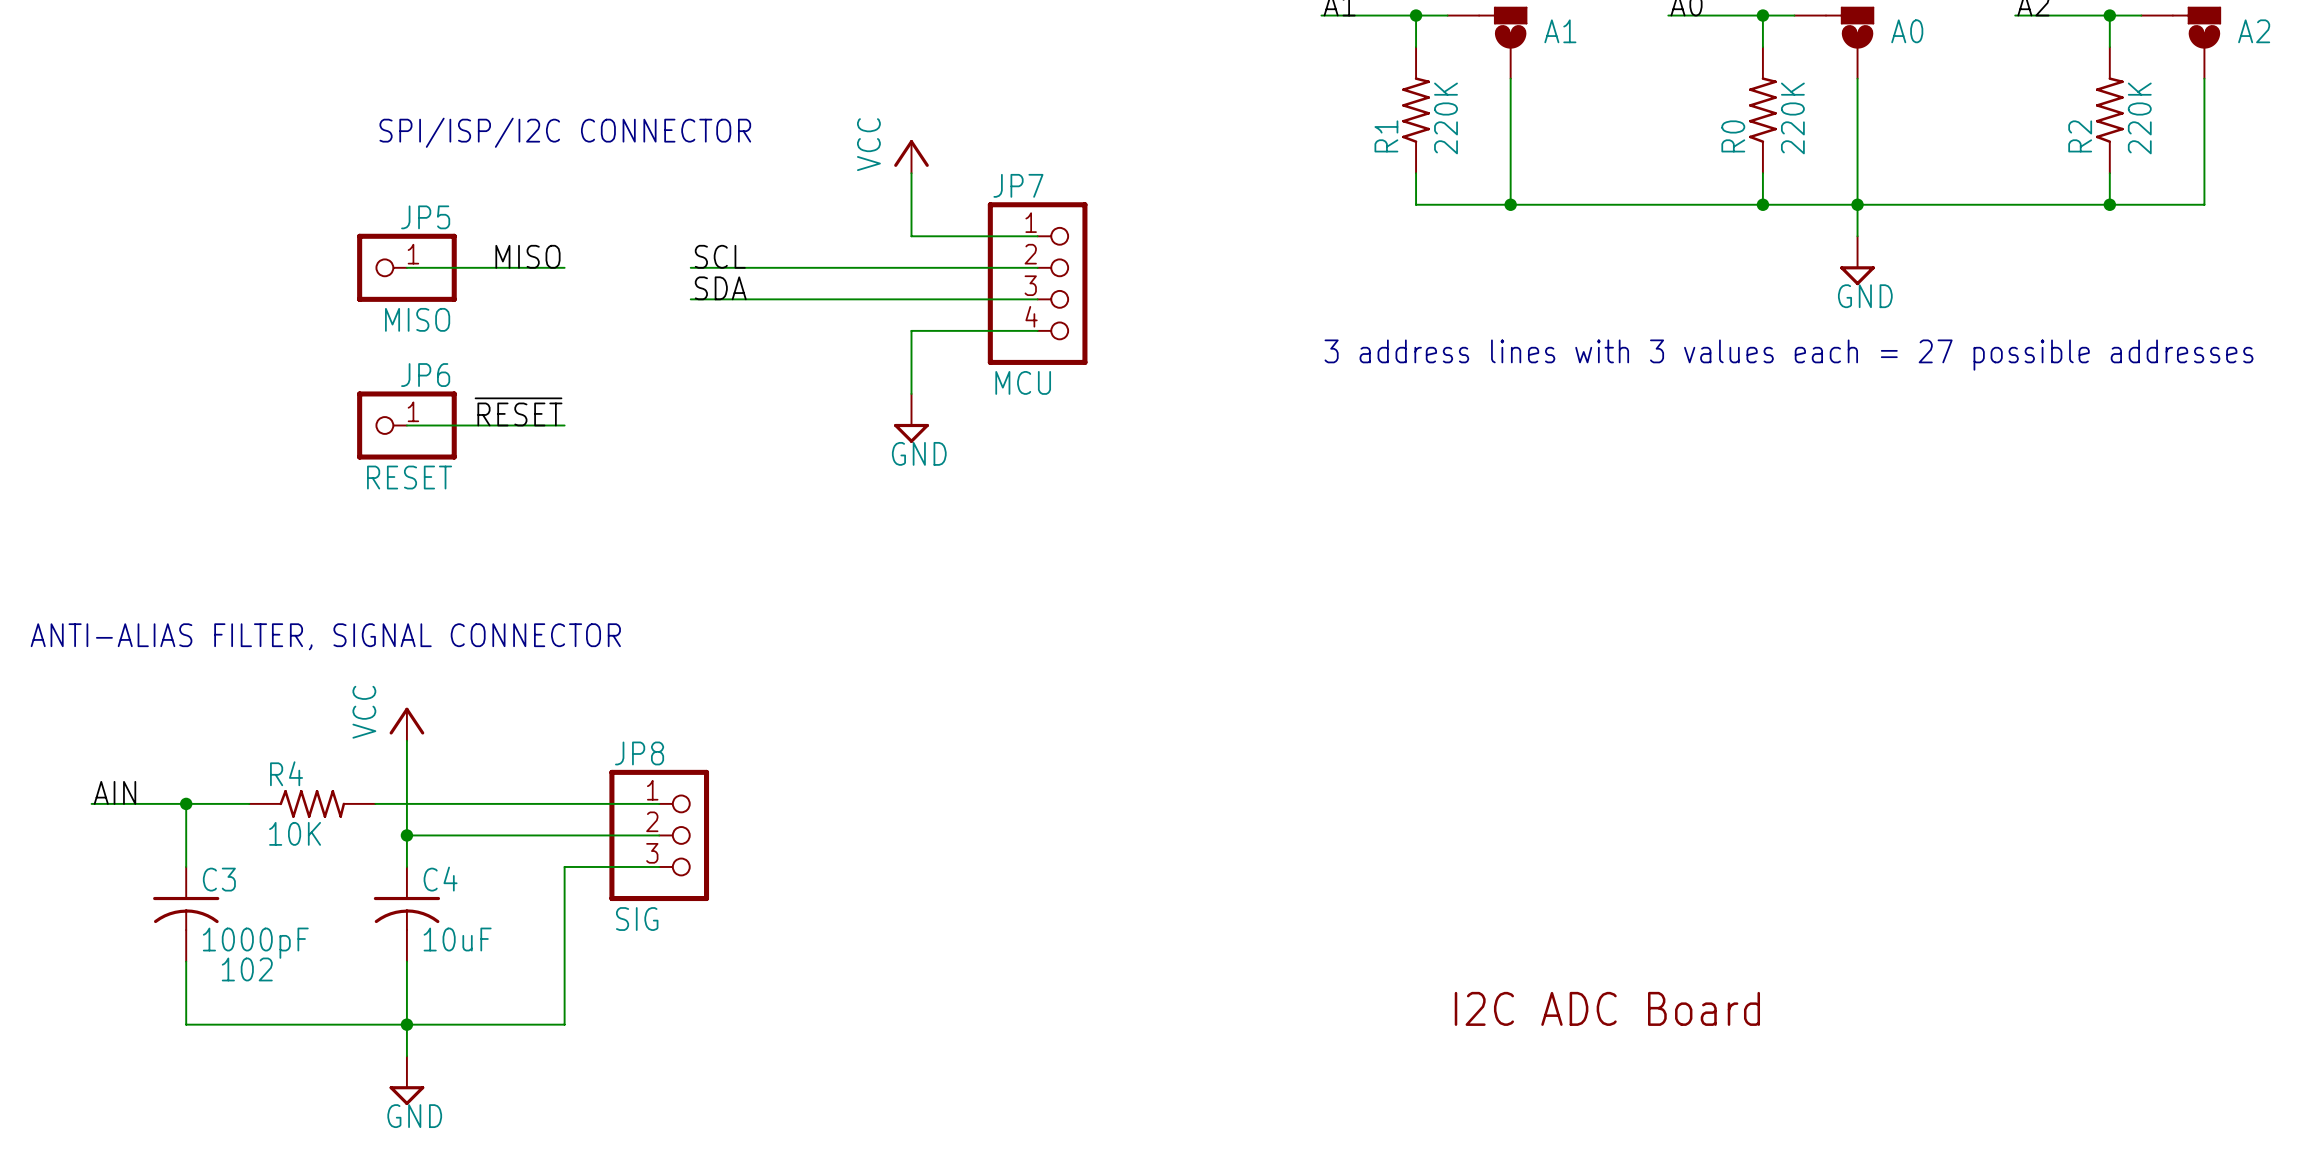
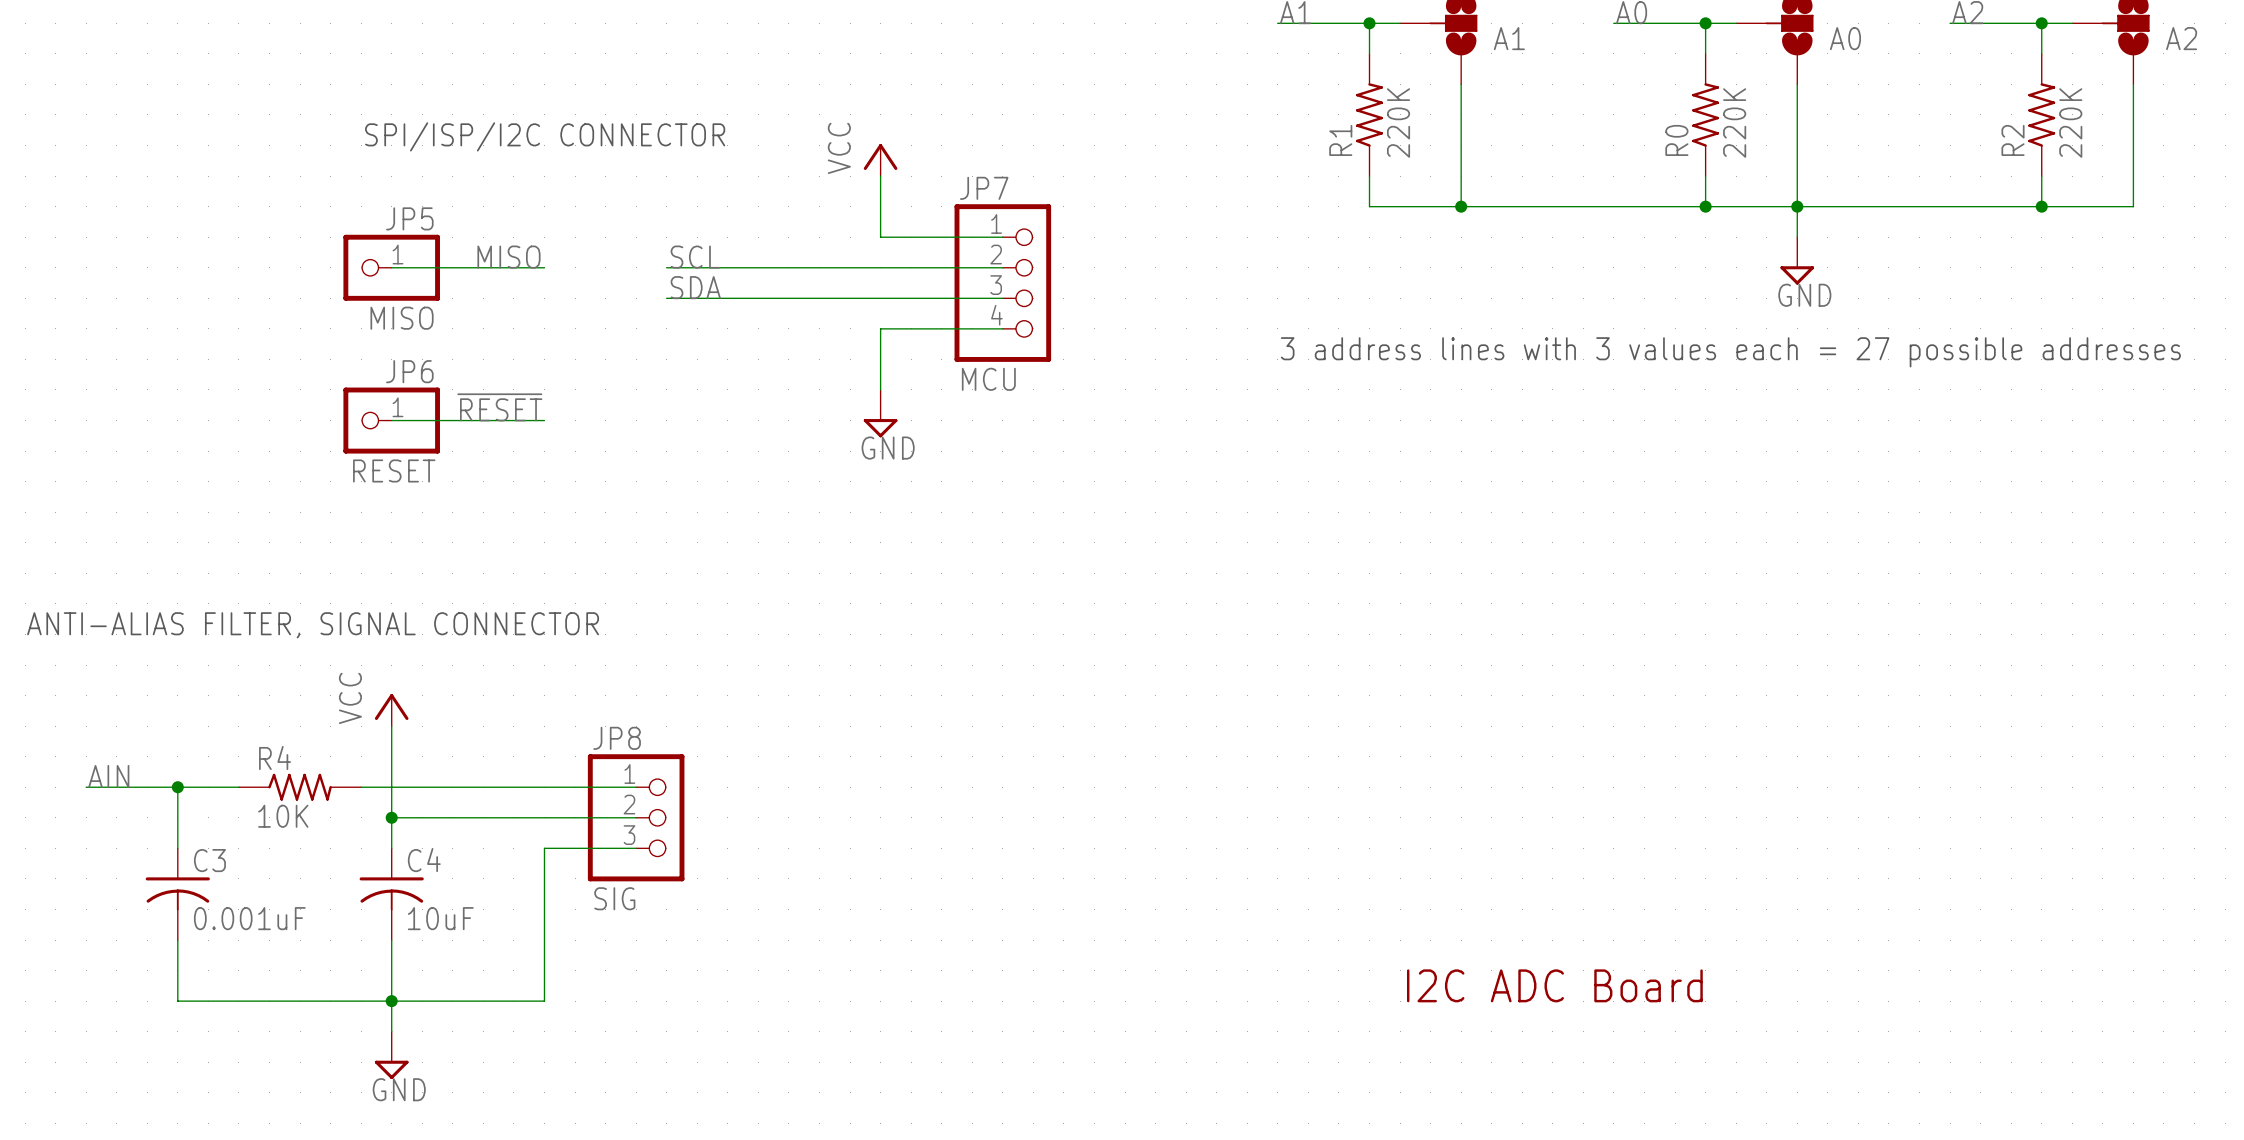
C3 value: 1000pF (255, 943) -> 0.001uF (249, 918)
C3 text: 102 (247, 969) -> none

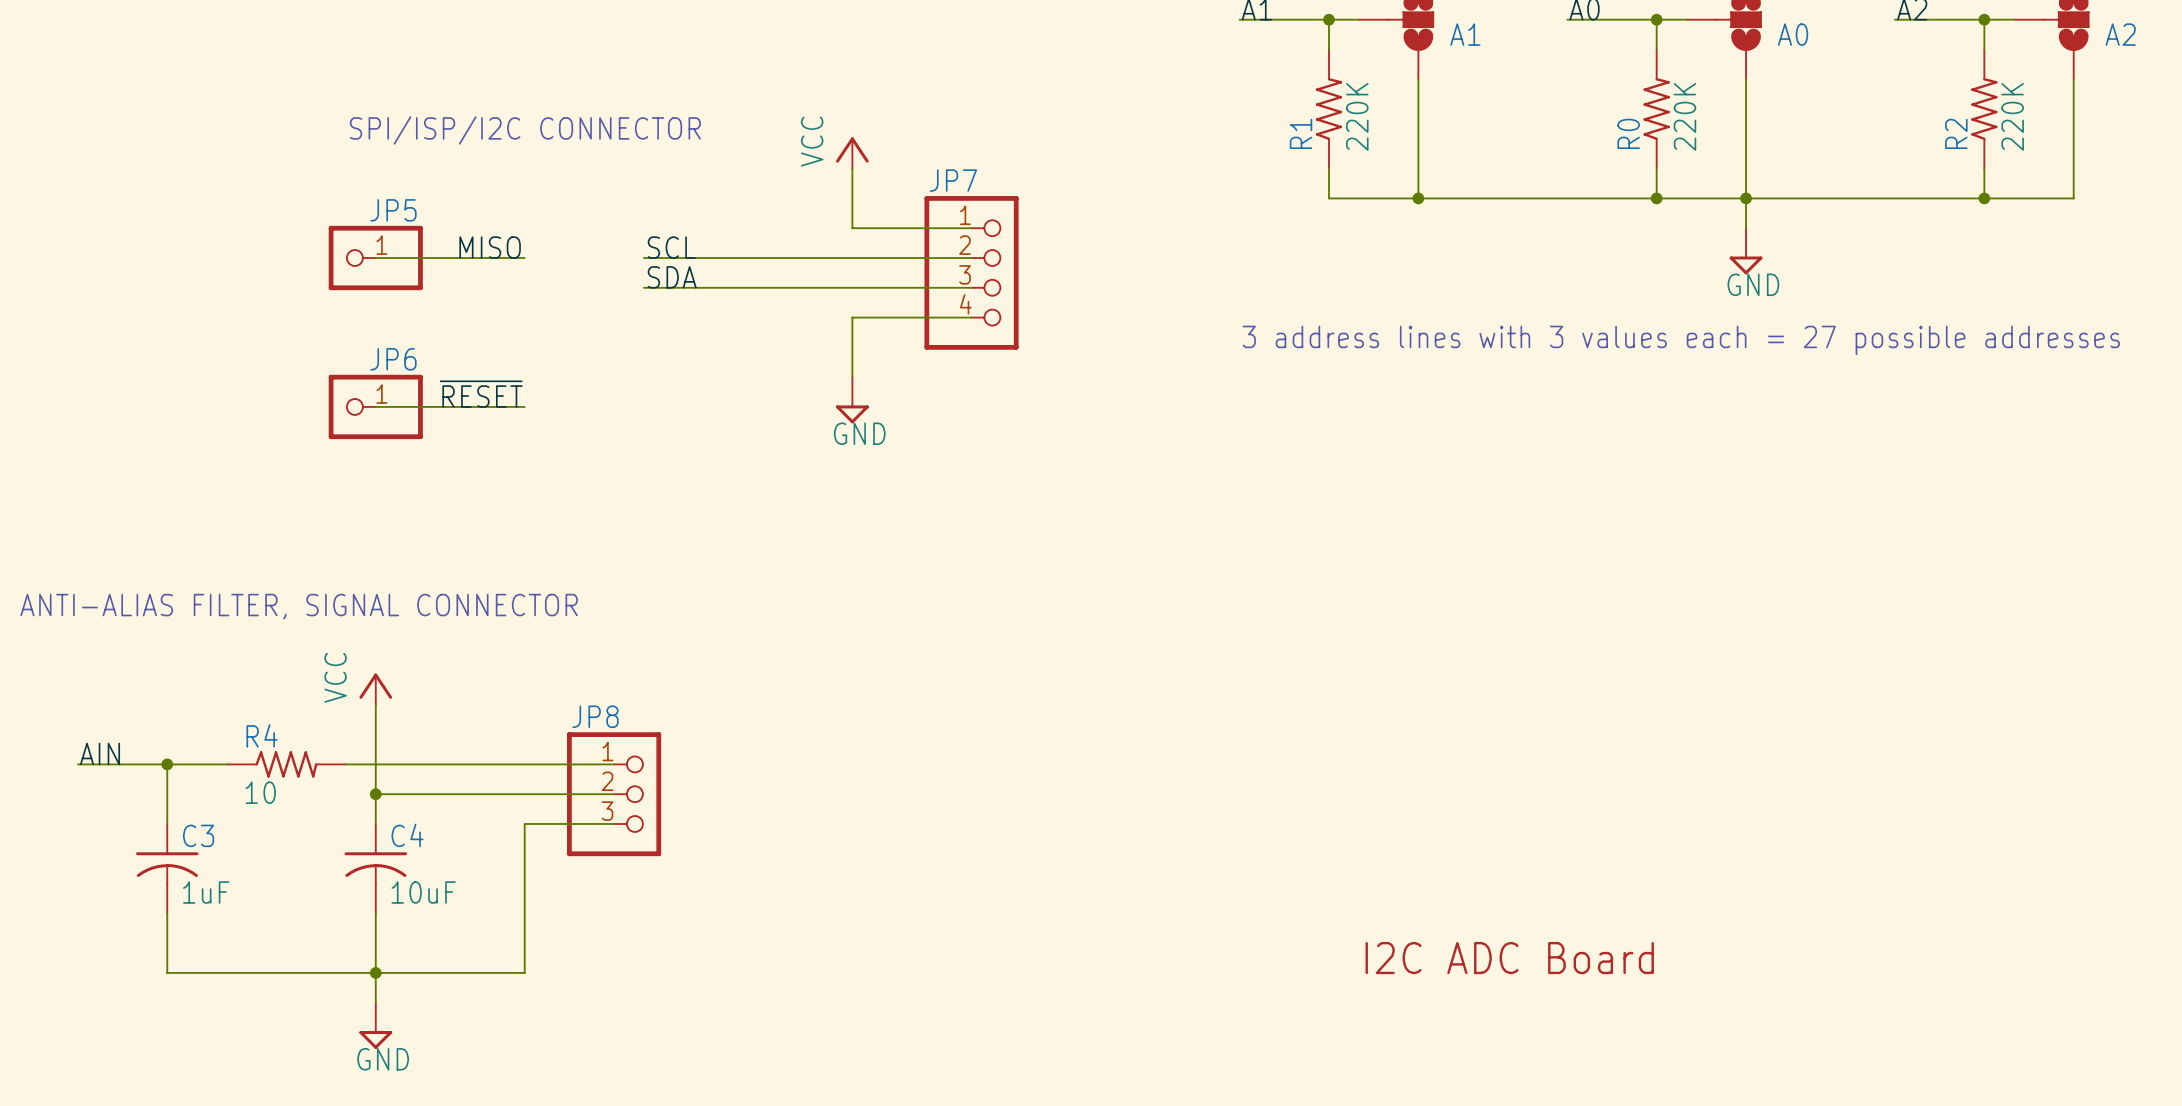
JP5 value: MISO (402, 318) -> none
JP7 value: MCU (988, 379) -> none
JP6 value: RESET (394, 470) -> none
R4 value: 10K (283, 816) -> 10 (260, 792)
JP8 value: SIG (614, 898) -> none
C3 value: 0.001uF (249, 918) -> 1uF (206, 892)

